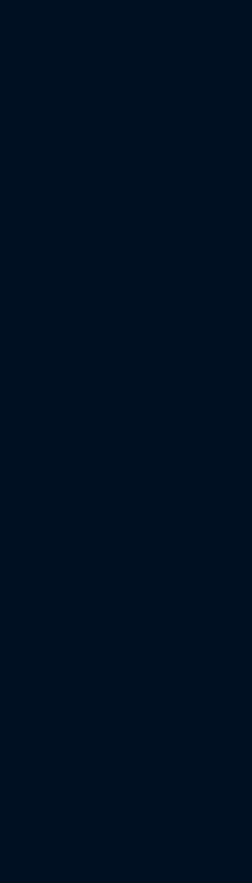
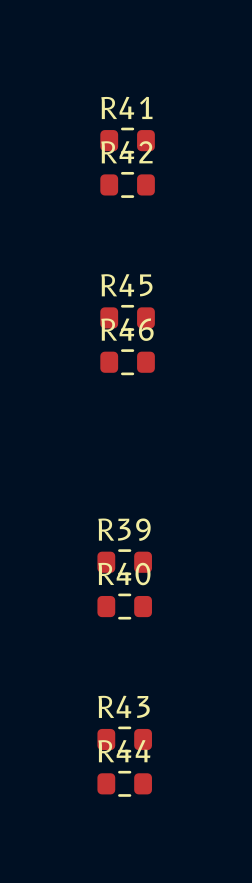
R41: none -> (127, 140)
R42: none -> (127, 184)
R45: none -> (127, 317)
R46: none -> (127, 362)
R39: none -> (124, 562)
R40: none -> (124, 606)
R43: none -> (124, 739)
R44: none -> (124, 783)

